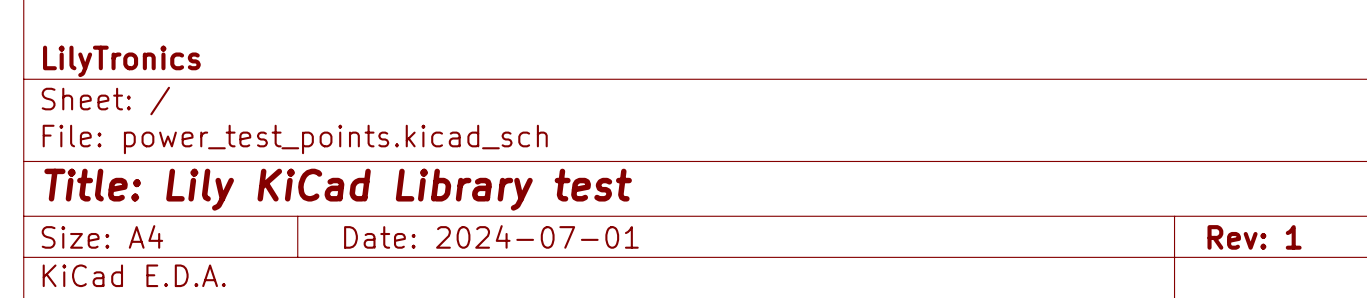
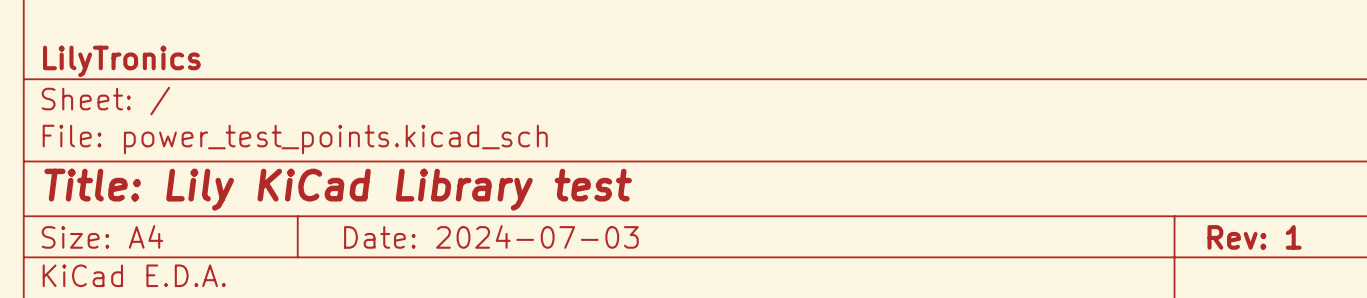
title block: Date: 2024-07-01 (491, 236) -> Date: 2024-07-03 (491, 236)

